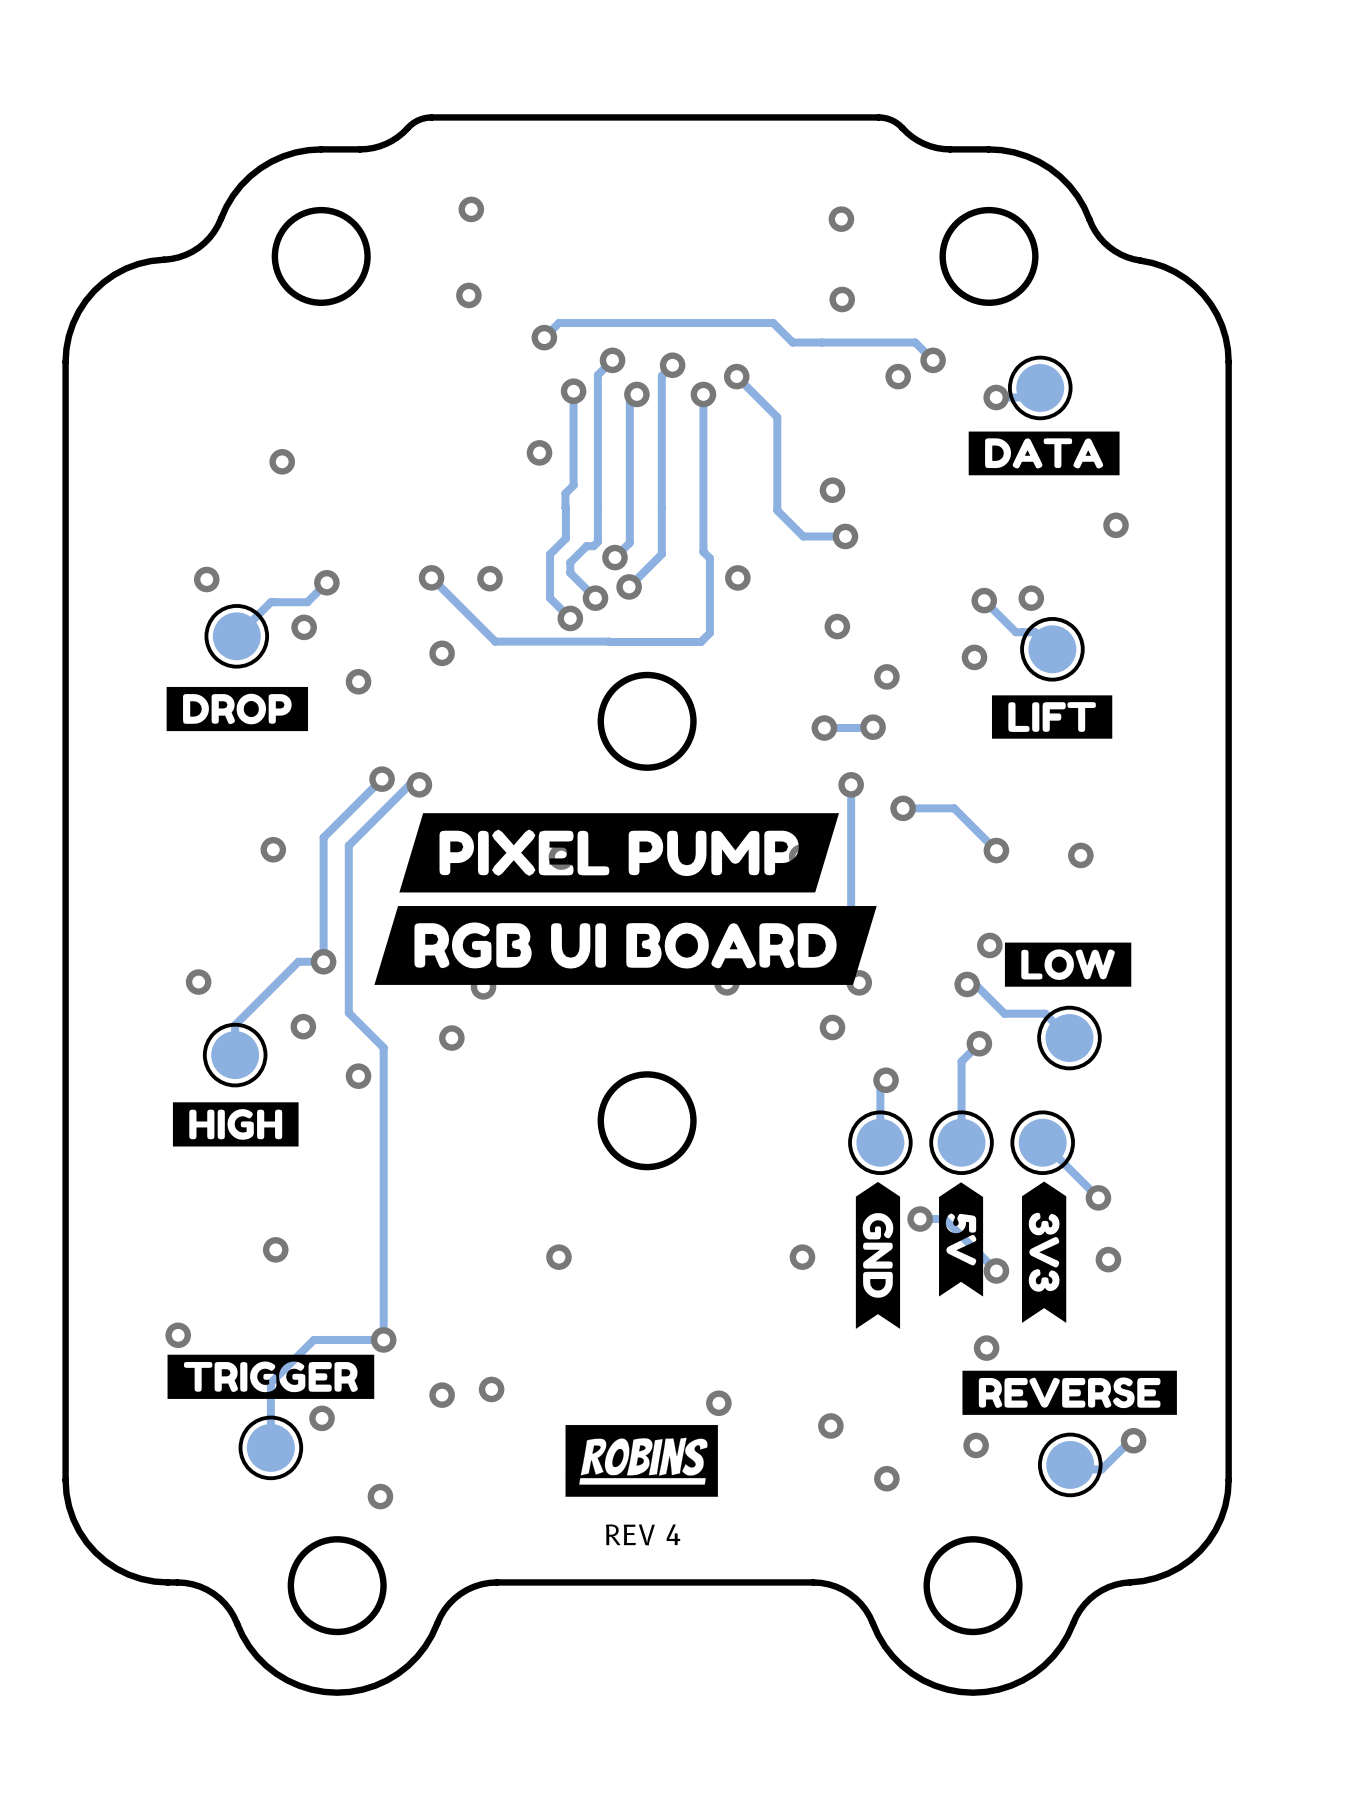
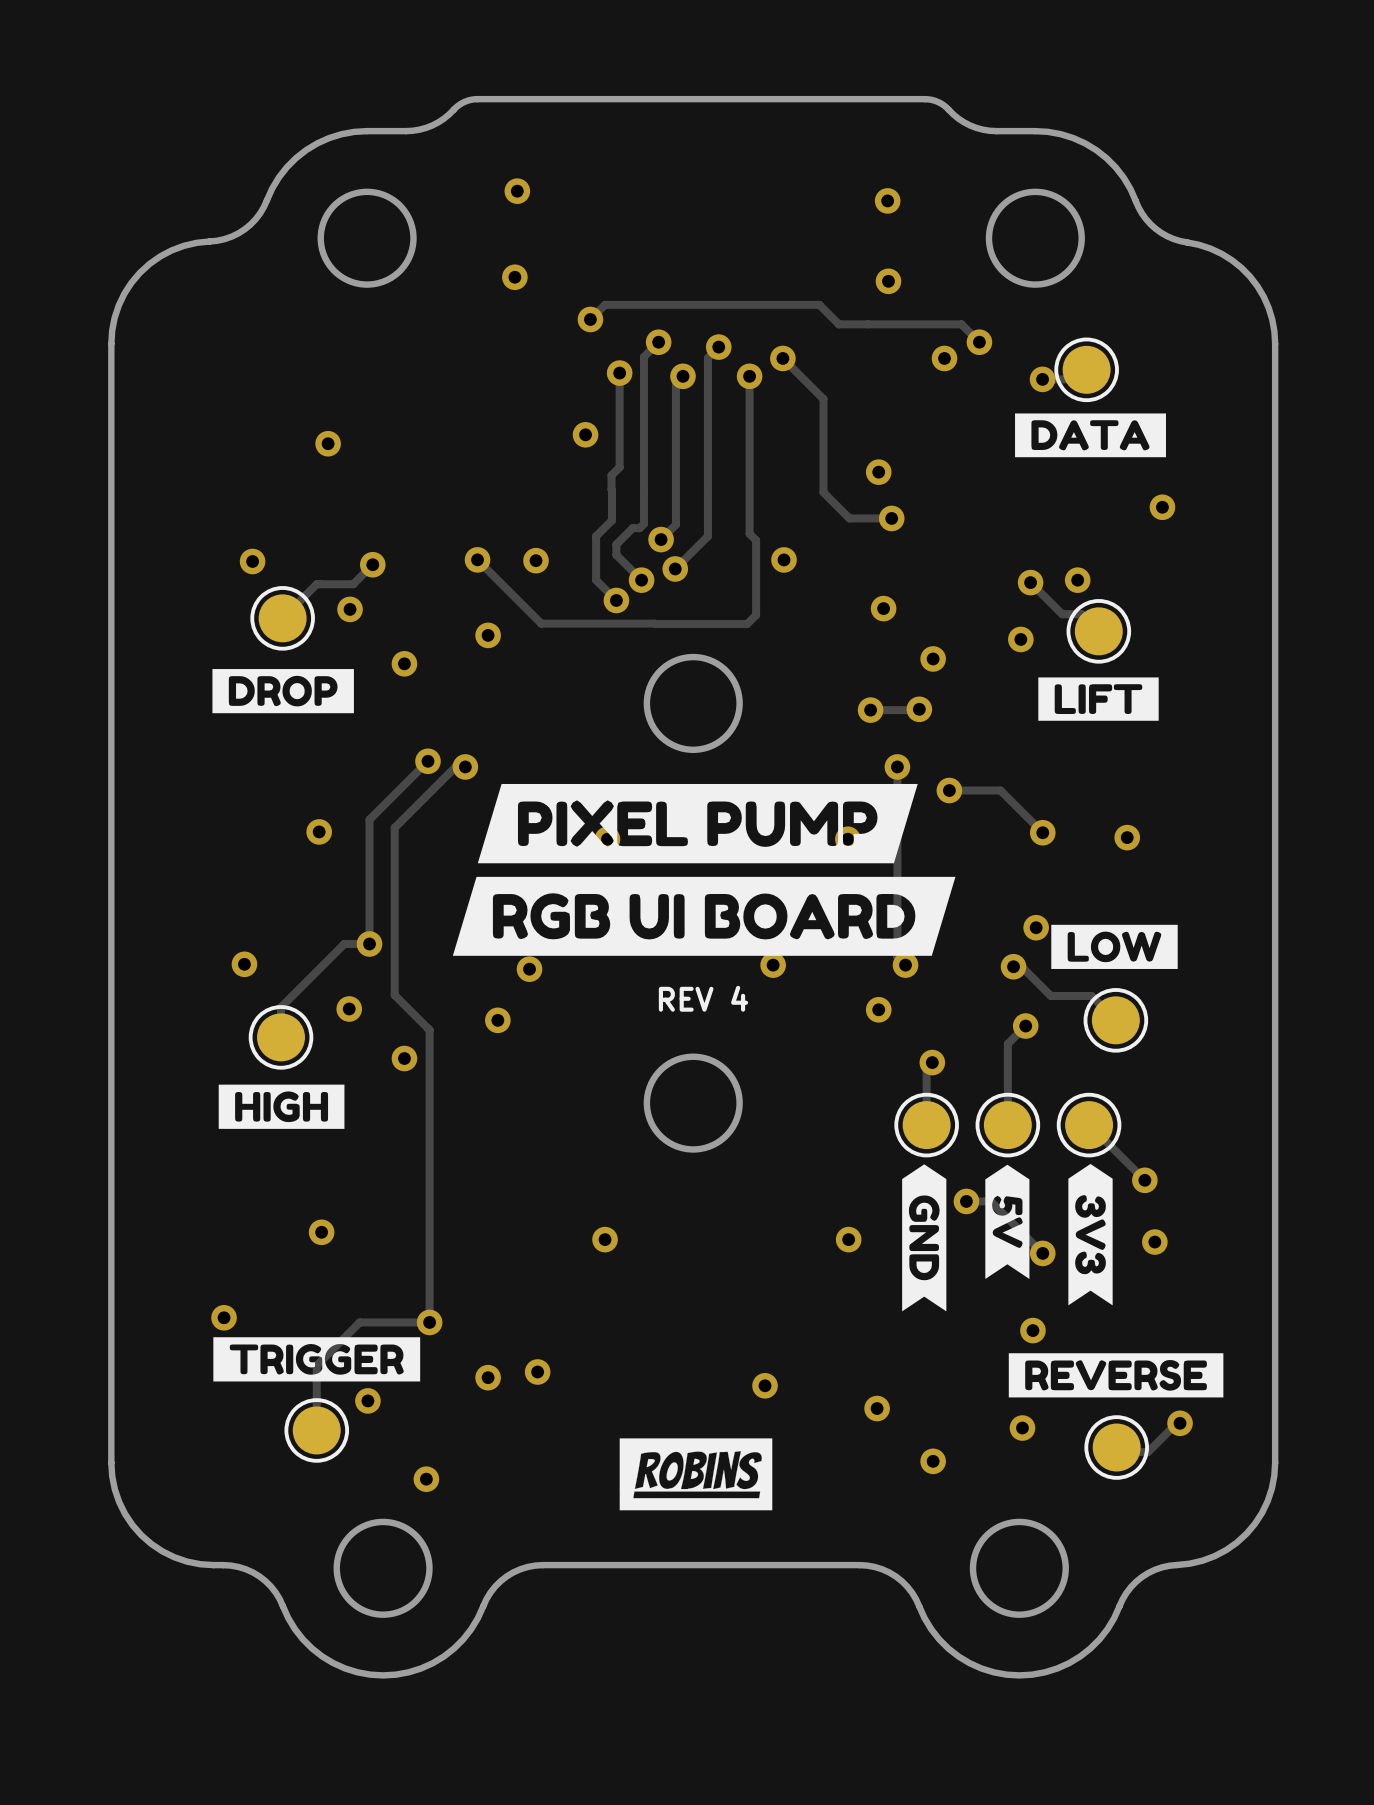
drawing position: (619, 852) -> (697, 823)
drawing position: (625, 945) -> (704, 916)
drawing position: (642, 1448) -> (696, 1461)
drawing position: (596, 1449) -> (650, 1463)
drawing position: (617, 1458) -> (672, 1471)
drawing position: (641, 1460) -> (696, 1474)
drawing position: (640, 1461) -> (694, 1475)
text position: REV 4 (643, 1534) -> REV 4 (703, 998)

